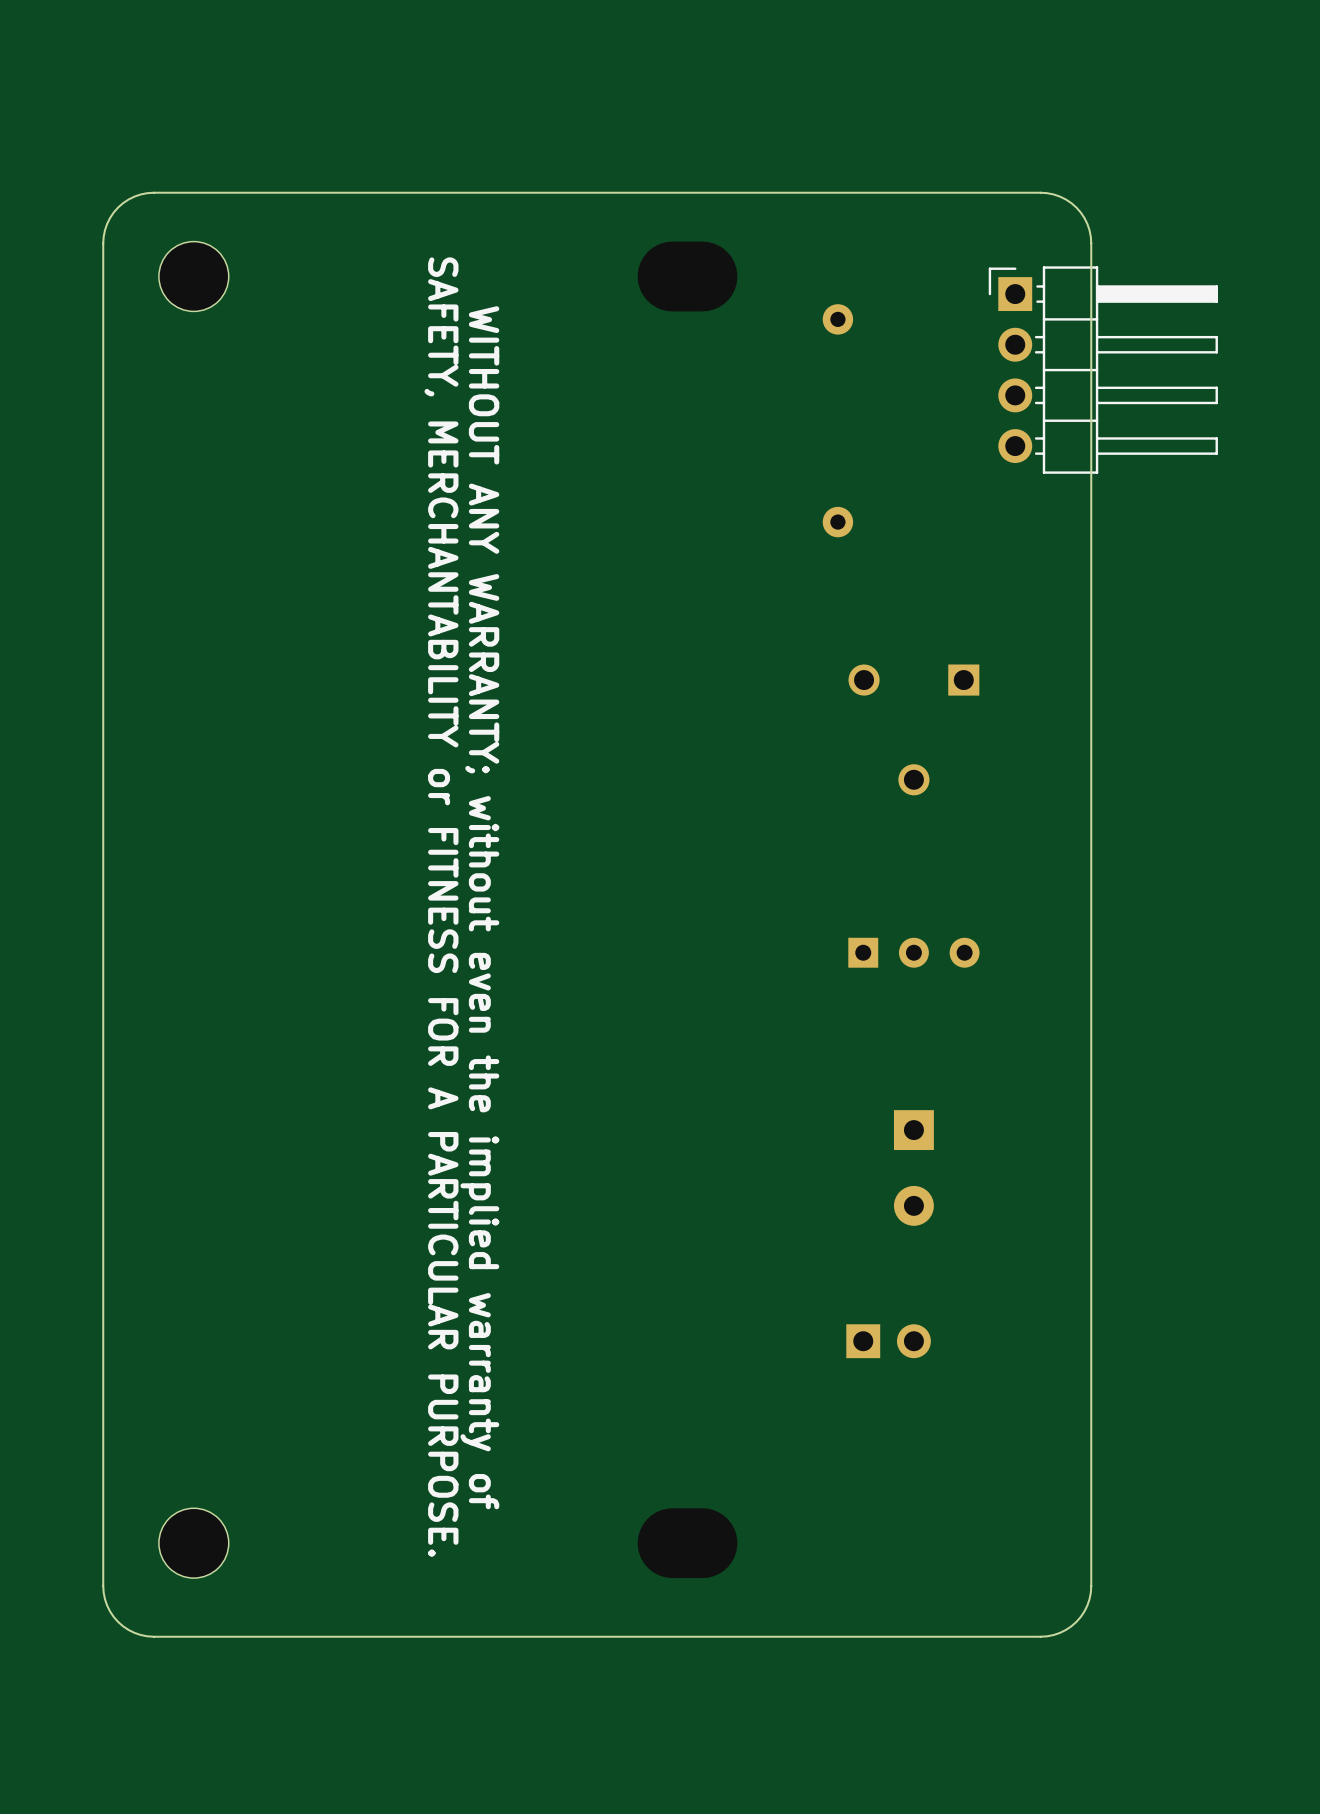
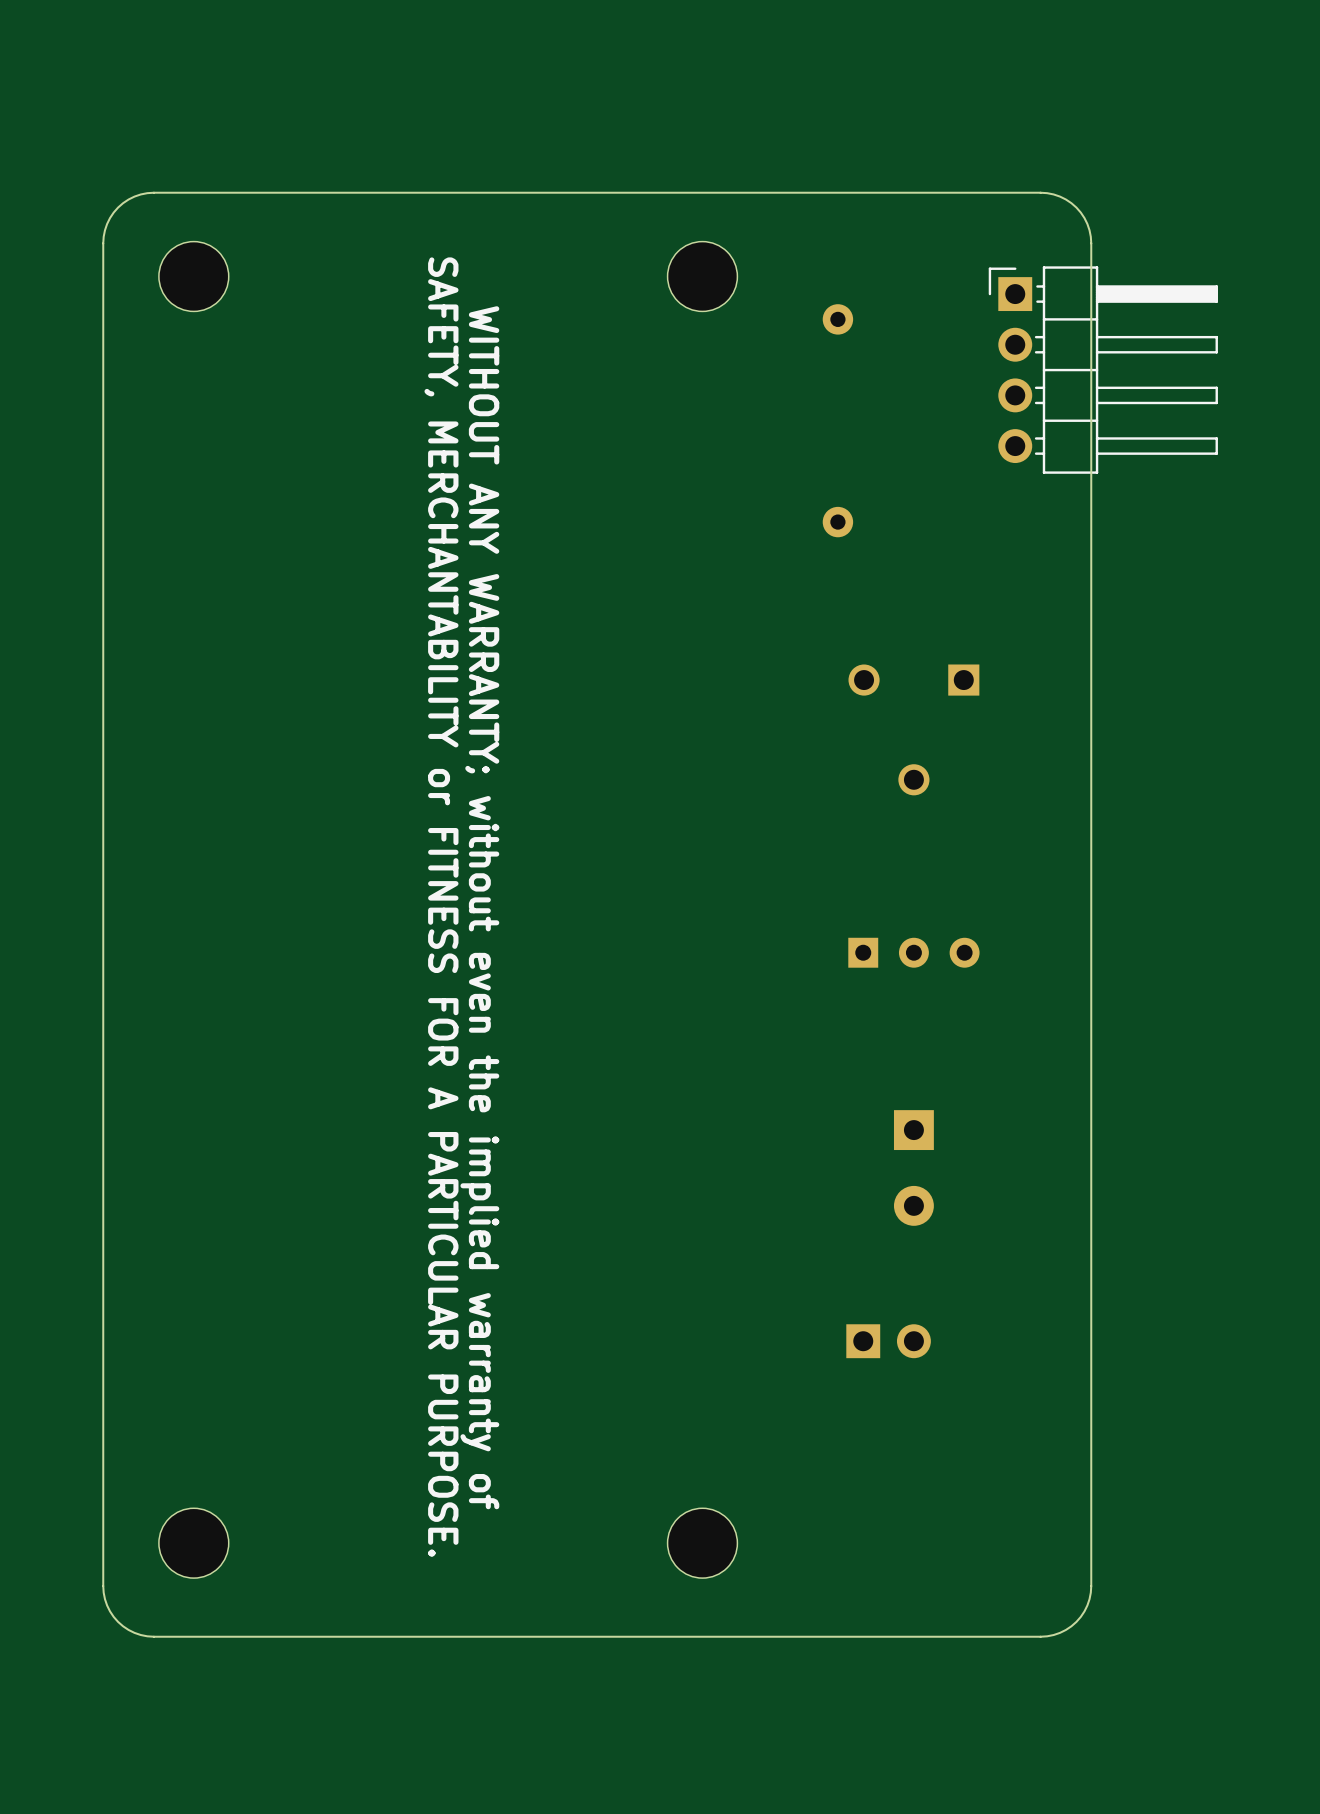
part footprint: [637, 241, 738, 312] -> [667, 241, 738, 312]
part footprint: [637, 1508, 738, 1579] -> [667, 1508, 738, 1579]

